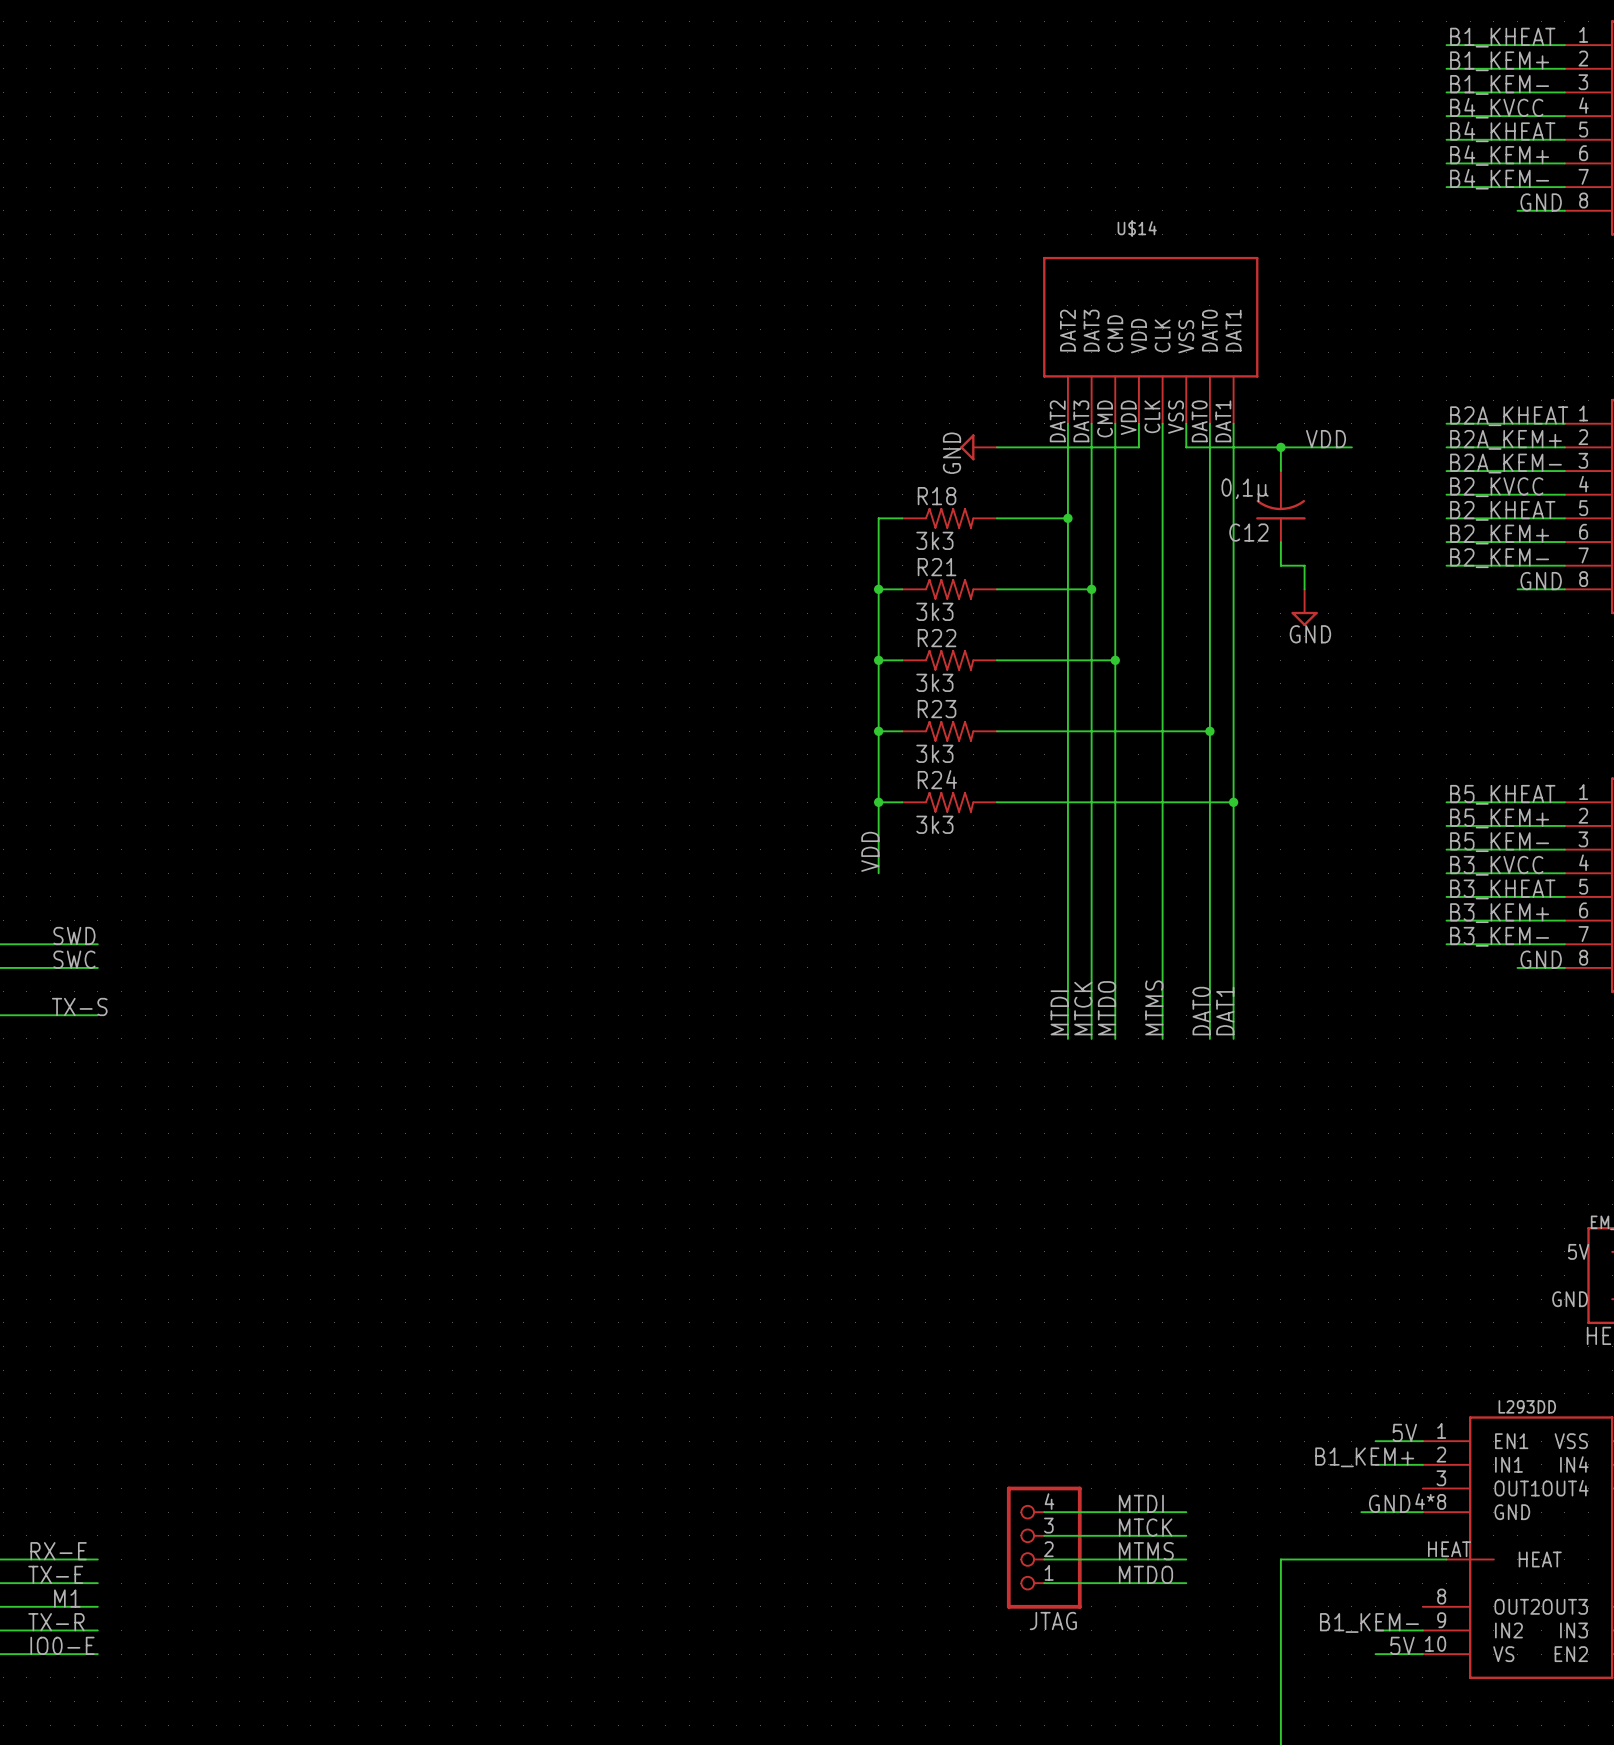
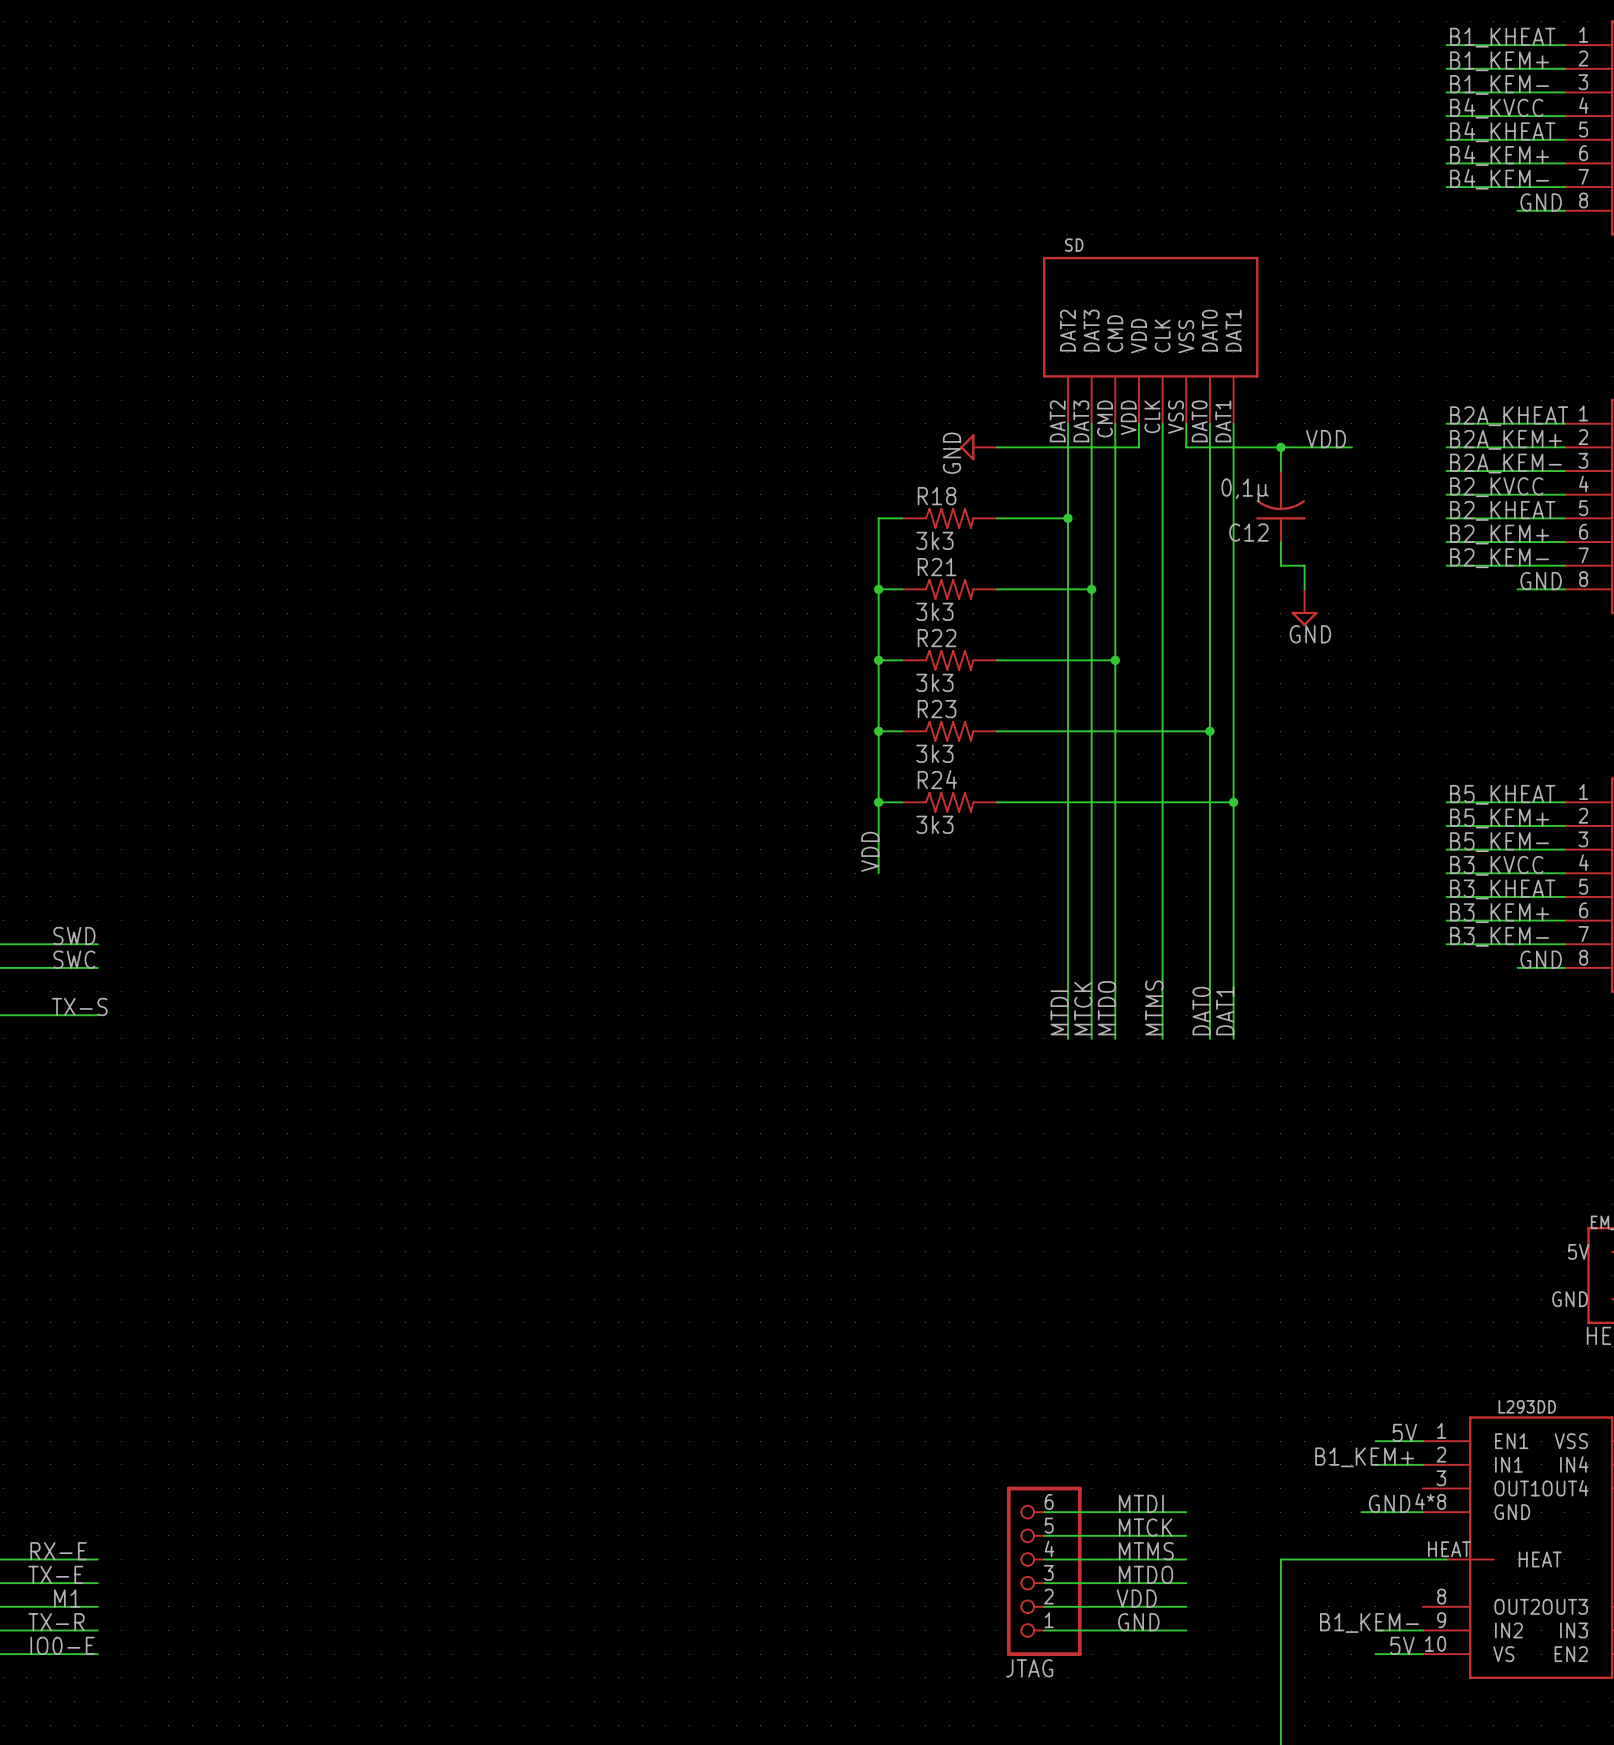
U$14 name: U$14 (1137, 228) -> SD (1074, 245)
JTAG: (1044, 1547) -> none
JTAG: none -> (1044, 1571)
label: none -> VDD (1136, 1598)
wire: none -> (1044, 1606) (1186, 1606)
label: none -> GND (1138, 1622)
wire: none -> (1044, 1630) (1186, 1630)

